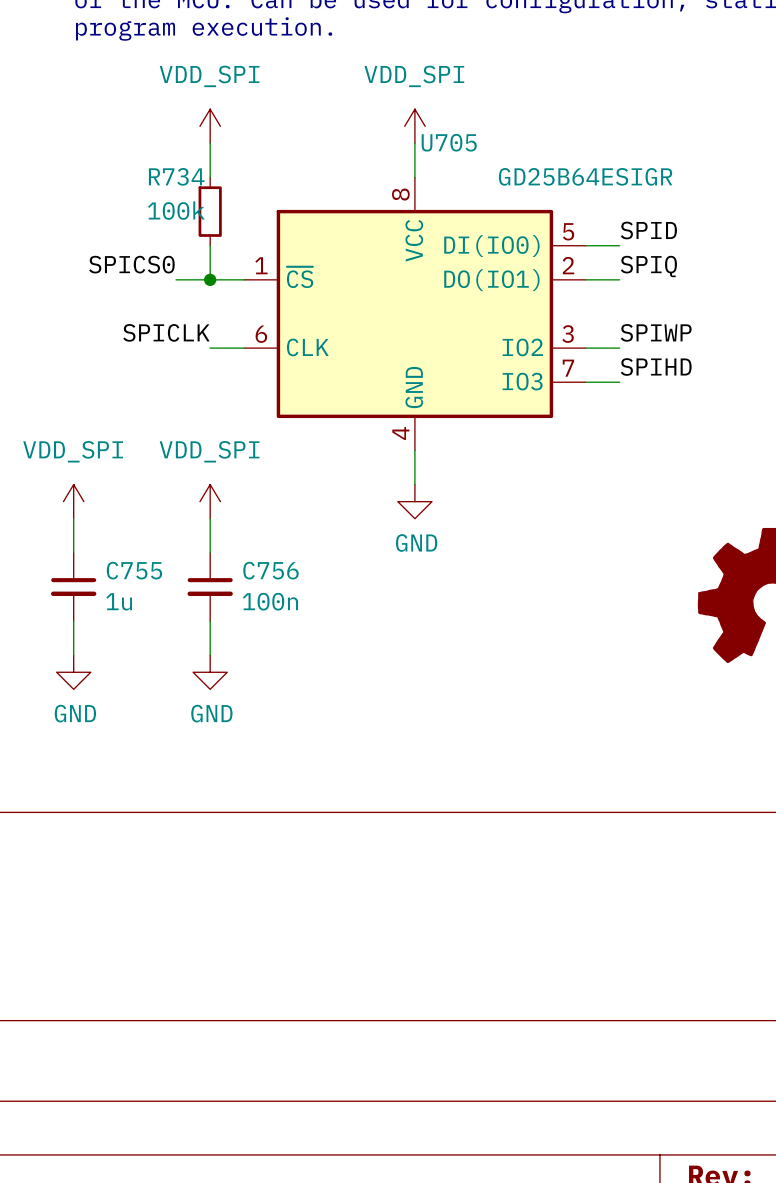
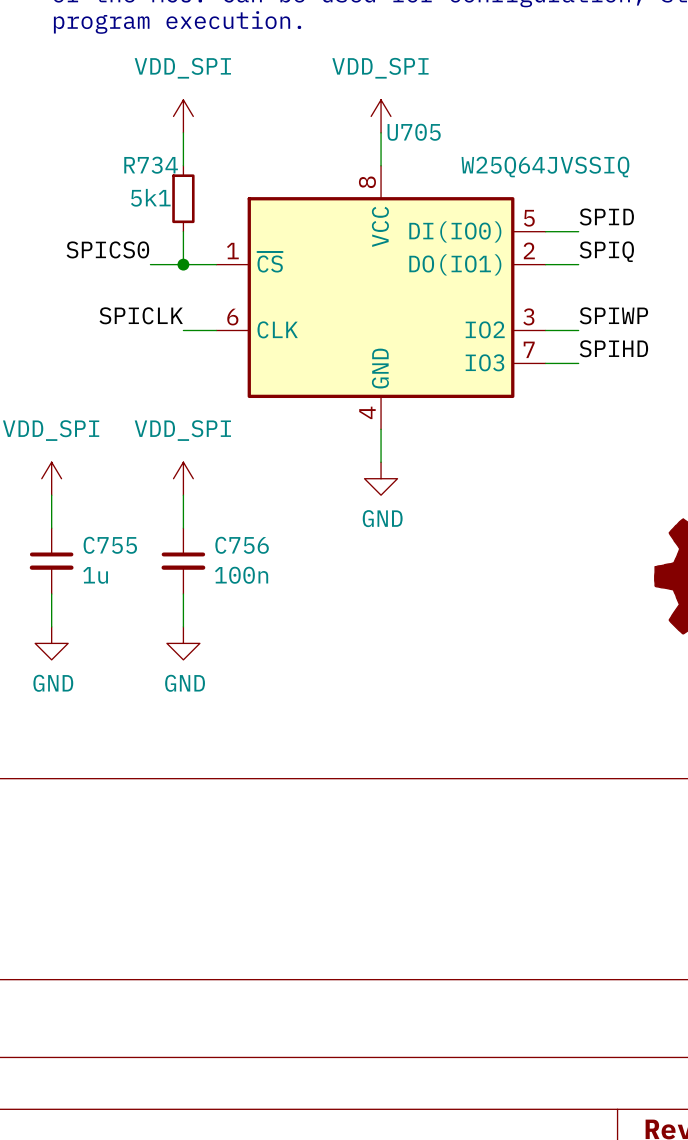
U705 value: GD25B64ESIGR (585, 176) -> W25Q64JVSSIQ (545, 166)
R734 value: 100k (176, 210) -> 5k1 (150, 197)

